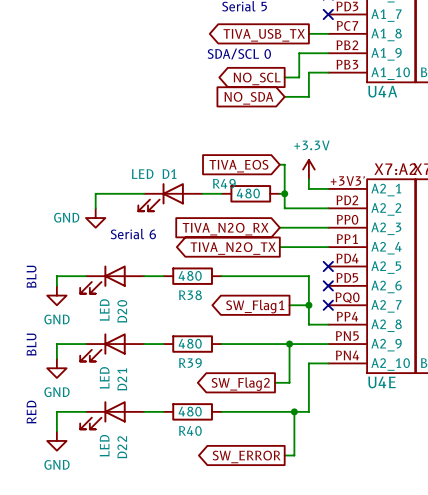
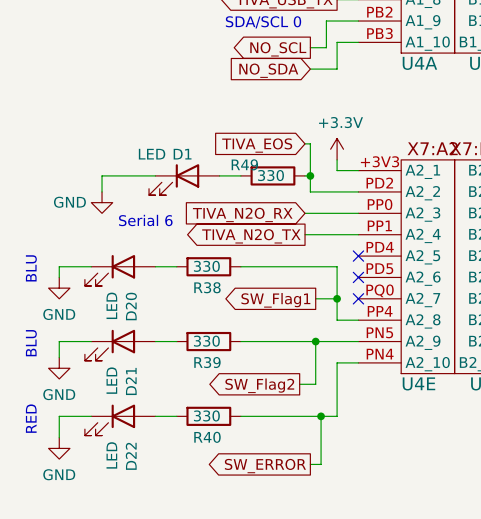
U4E pin number: +3V3' (347, 181) -> +3V3 (380, 161)
R49 value: 480 (248, 193) -> 330 (271, 175)
R38 value: 480 (190, 275) -> 330 (206, 266)
R39 value: 480 (190, 343) -> 330 (206, 341)
R40 value: 480 (190, 411) -> 330 (206, 415)

